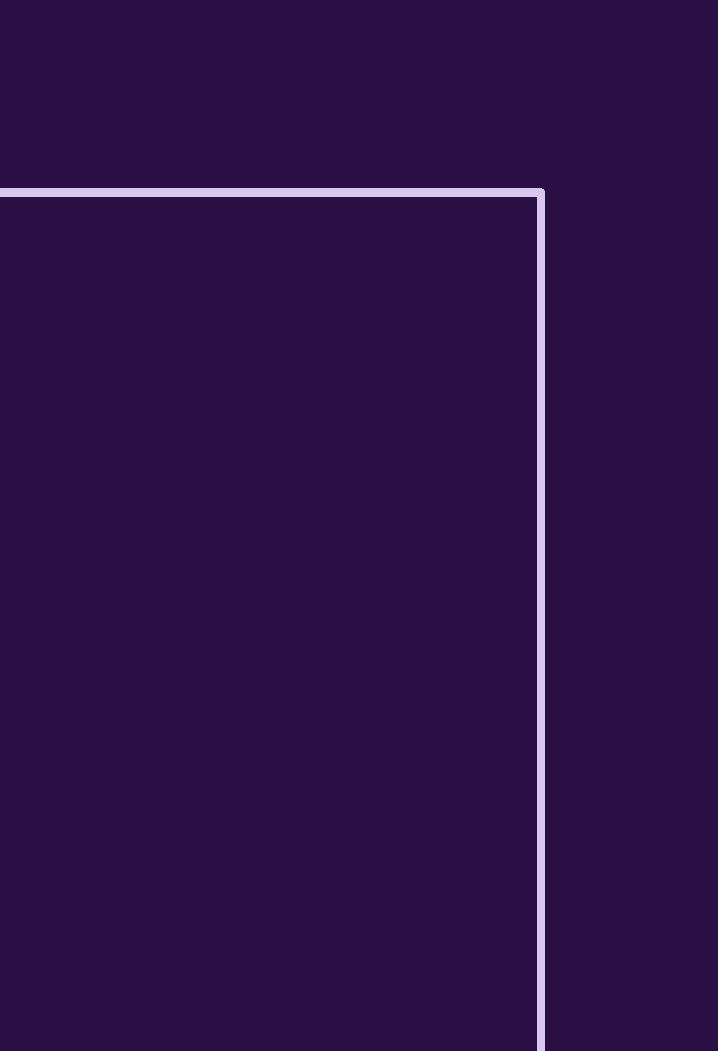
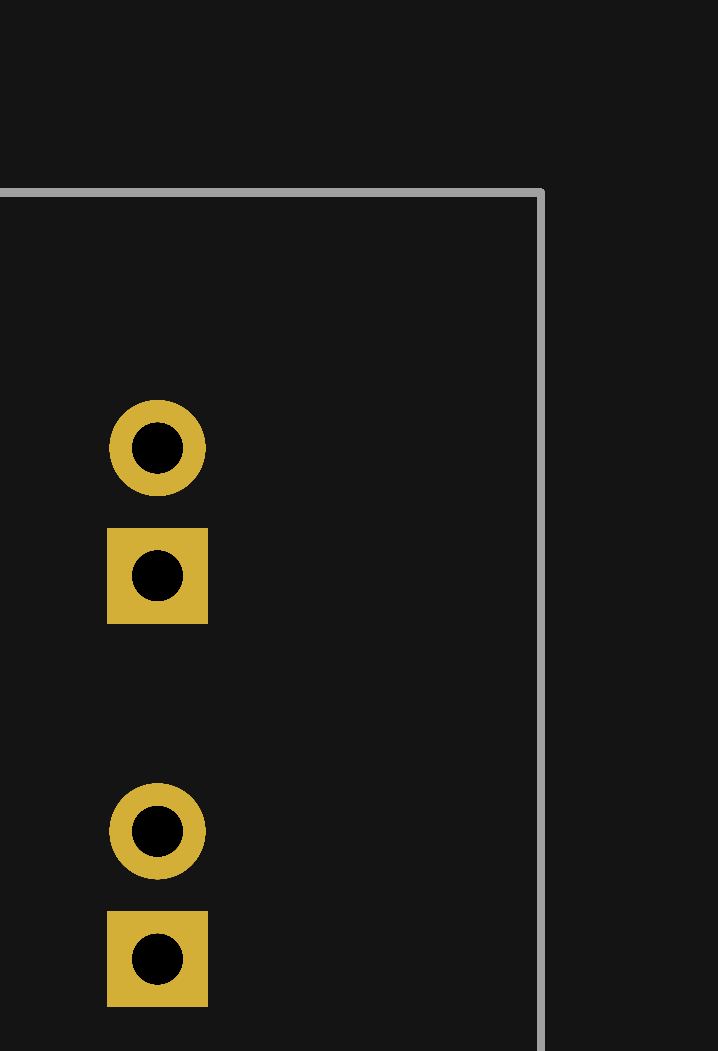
part: none -> (157, 511)
part: none -> (157, 895)

